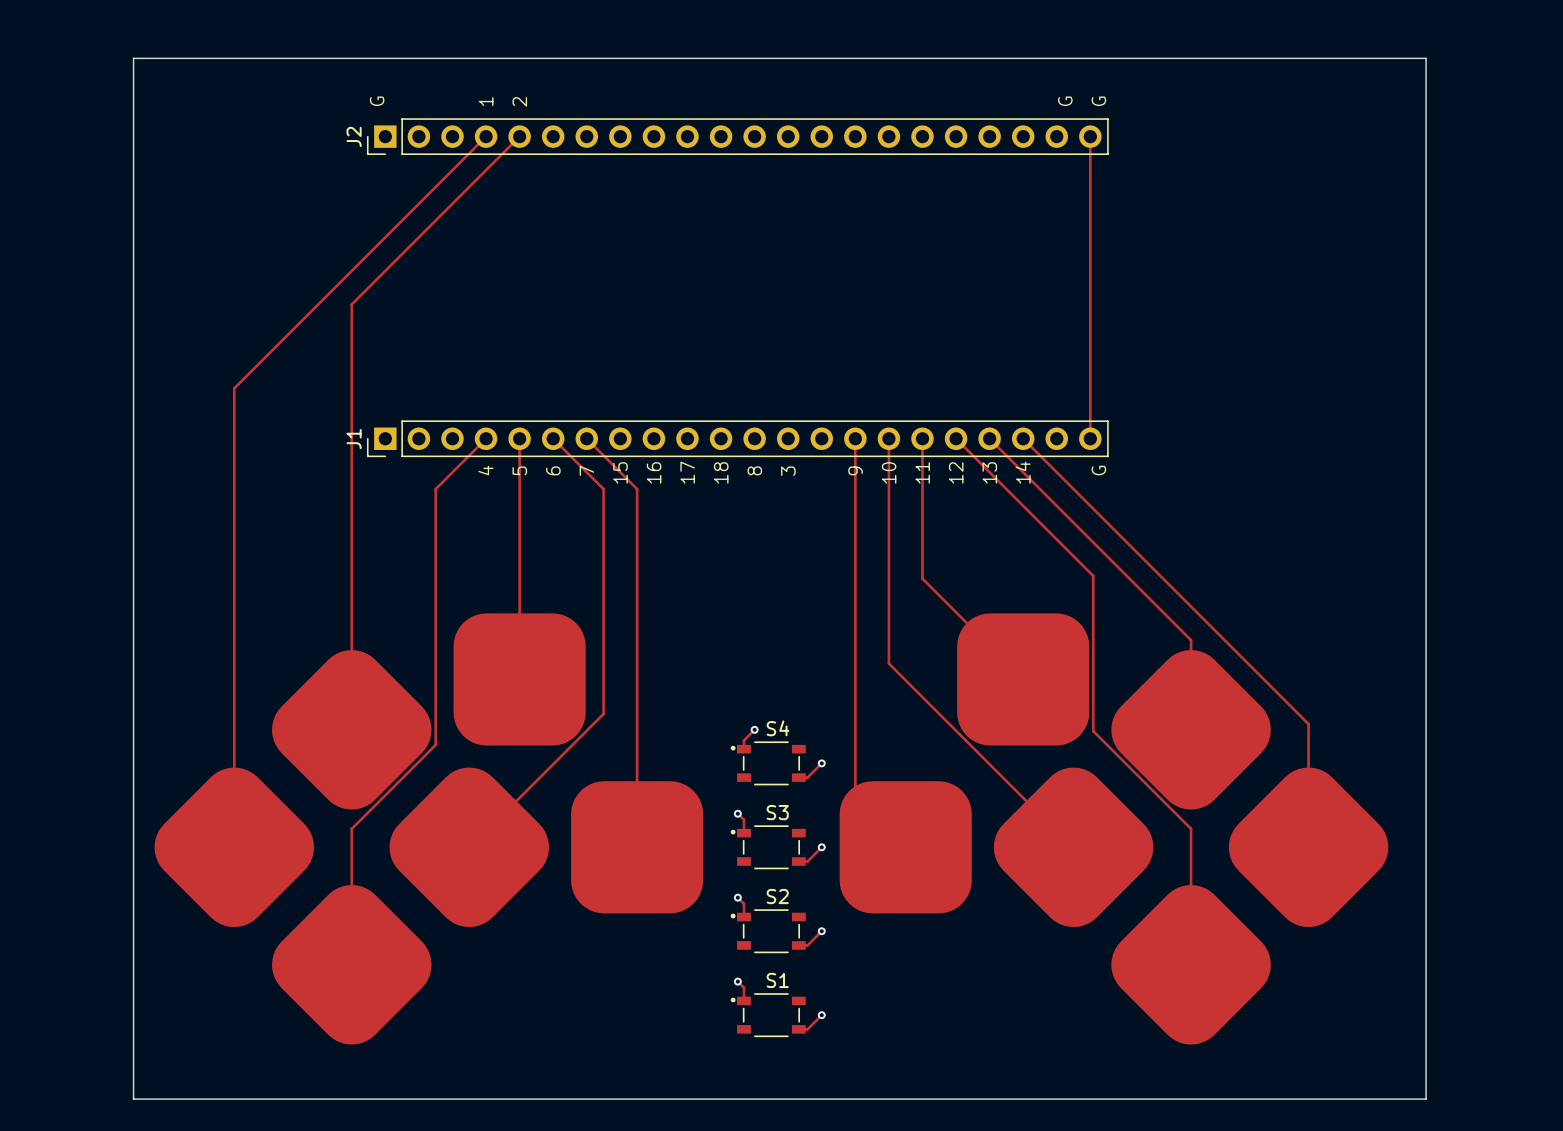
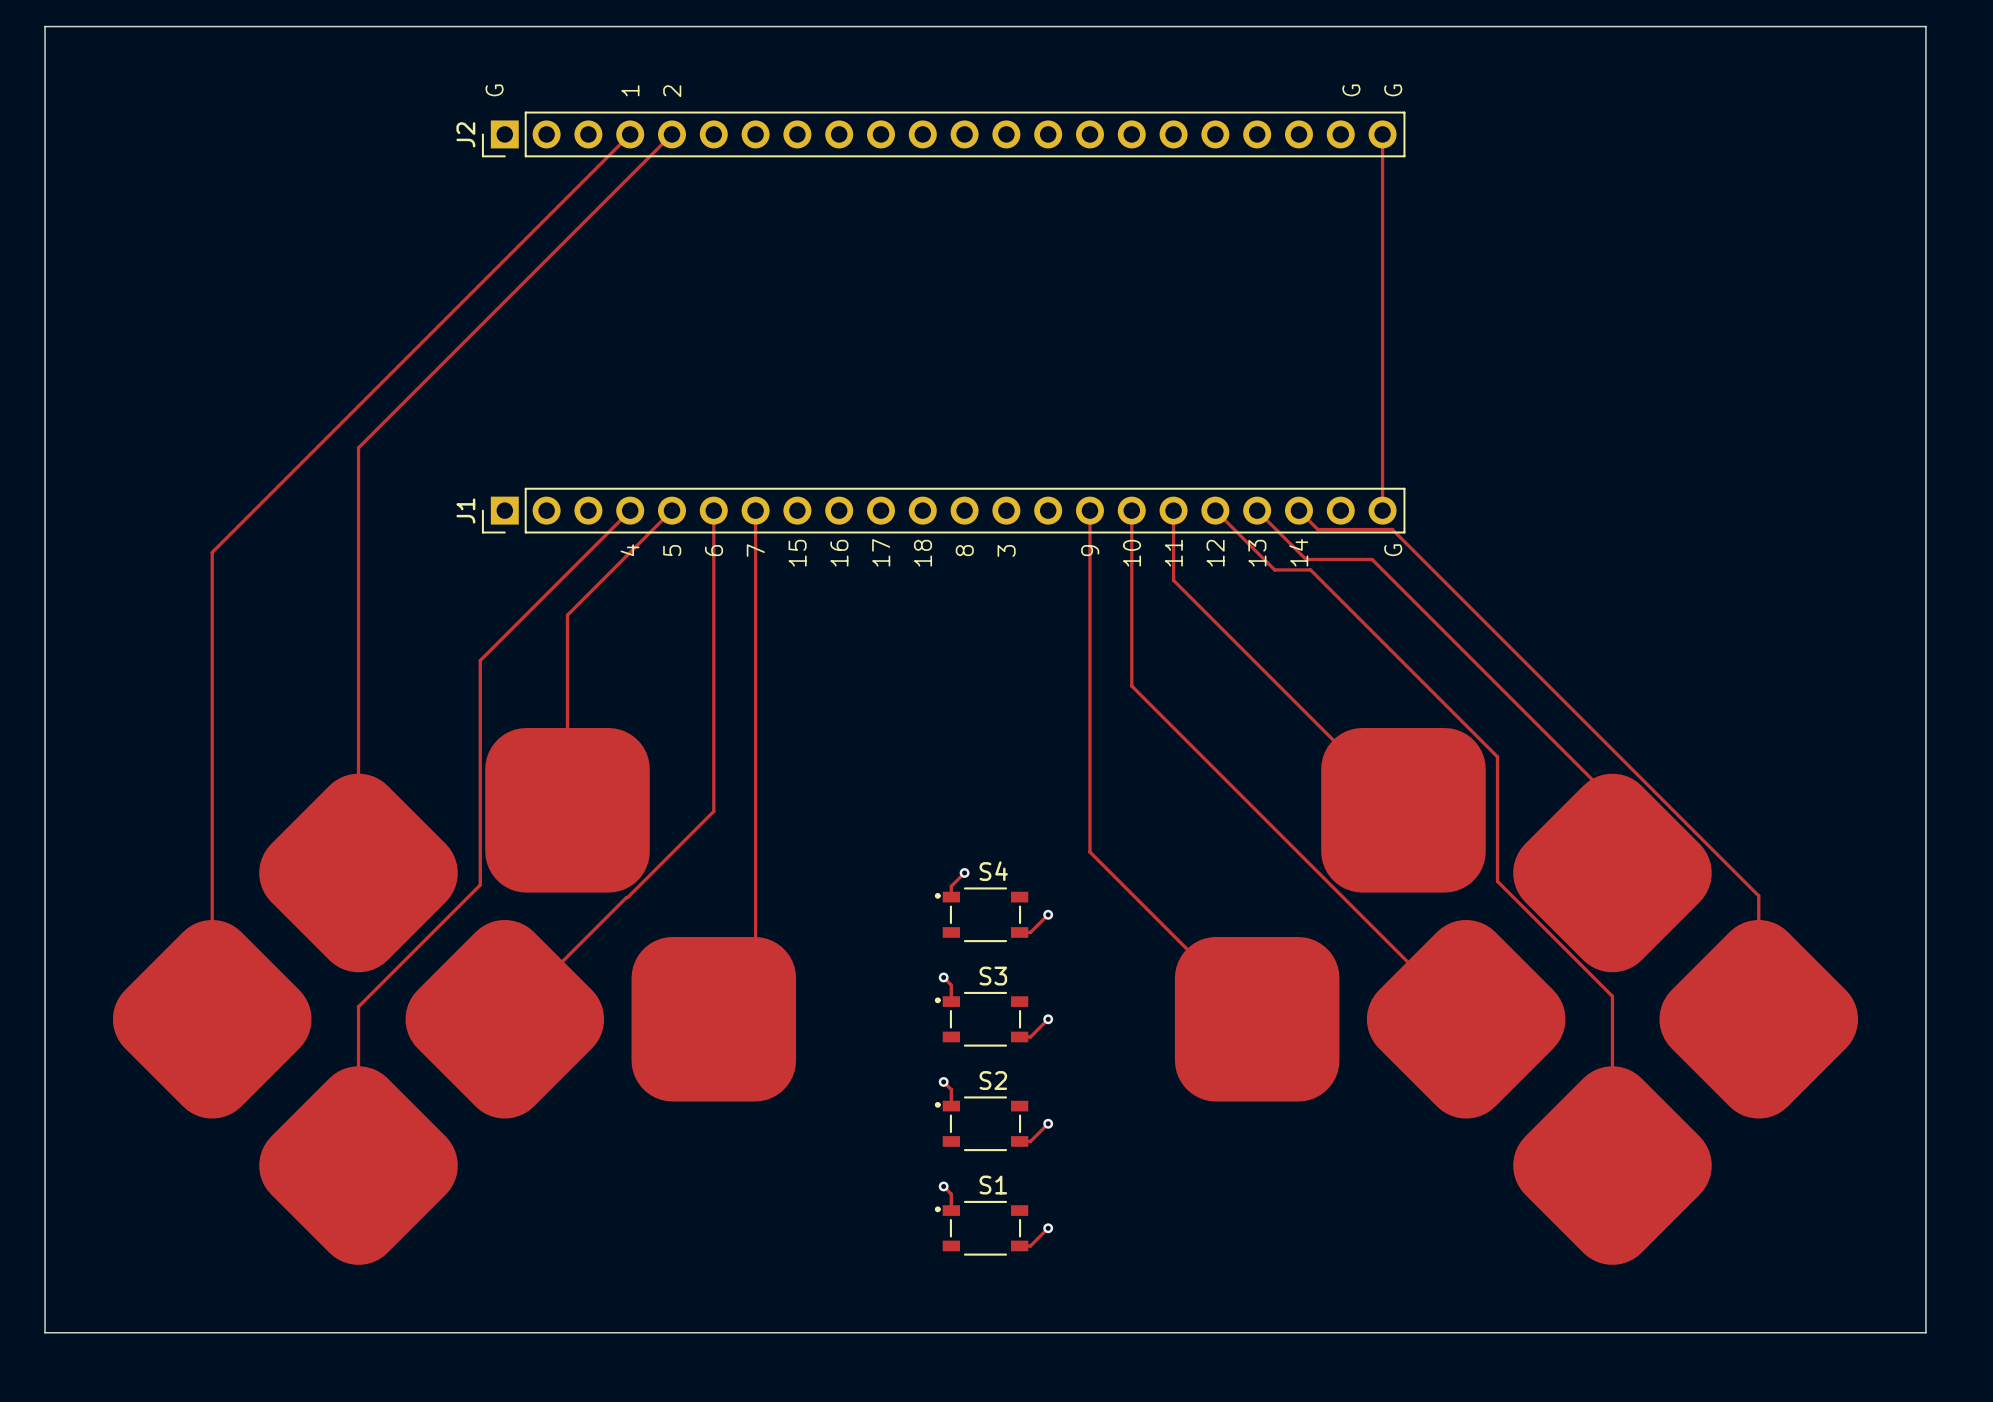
track: (351, 304) (351, 729) -> (463, 343) (358, 447) (358, 872)
track: (234, 388) (234, 847) -> (316, 447) (212, 552) (212, 1019)
track: (519, 438) (519, 679) -> none
track: (553, 438) (603, 489) (603, 713) (469, 847) -> (713, 510) (713, 811) (504, 1019)
track: (586, 438) (637, 489) (637, 847) -> (755, 510) (755, 987) (724, 1019)
track: (1038, 453) (1308, 724) (1308, 847) -> (1317, 529) (1392, 529) (1758, 895) (1758, 1019)
track: (1028, 478) (1191, 640) (1191, 729) -> (1306, 559) (1372, 559) (1612, 799) (1612, 872)
track: (1003, 486) (1093, 575) (1093, 731) (1191, 828) (1191, 964) -> (1274, 569) (1310, 569) (1497, 756) (1497, 881) (1612, 996) (1612, 1165)
track: (435, 489) (435, 522) -> (672, 510) (567, 615)
track: none -> (567, 573) (480, 660) (480, 884) (358, 1006) (358, 1165)
track: (922, 494) (922, 578) (1023, 679) -> (1173, 580) (1403, 810)
track: (888, 579) (888, 663) (1073, 847) -> (1131, 686) (1466, 1019)
track: (435, 679) (435, 744) (351, 828) (351, 964) -> none
part position: (519, 679) -> (567, 810)
part position: (1023, 679) -> (1403, 810)
track: (855, 713) (855, 796) (905, 847) -> (1089, 852) (1257, 1019)
part: none -> (358, 872)
part: (351, 729) -> none
part: (1191, 729) -> none
part: none -> (1612, 872)
part: none -> (212, 1019)
part: (234, 847) -> none
part: none -> (504, 1019)
part: (469, 847) -> none
part position: (637, 847) -> (713, 1019)
part position: (905, 847) -> (1257, 1019)
part: (1073, 847) -> none
part: none -> (1466, 1019)
part: (1308, 847) -> none
part: none -> (1758, 1019)
part: none -> (358, 1165)
part: (351, 964) -> none
part: (1191, 964) -> none
part: none -> (1612, 1165)
board edge: (133, 1099) (133, 58) (1426, 58) (1426, 1099) -> (191, 1332) (45, 1332) (45, 26) (1925, 26) (1925, 1332) (1800, 1332)

